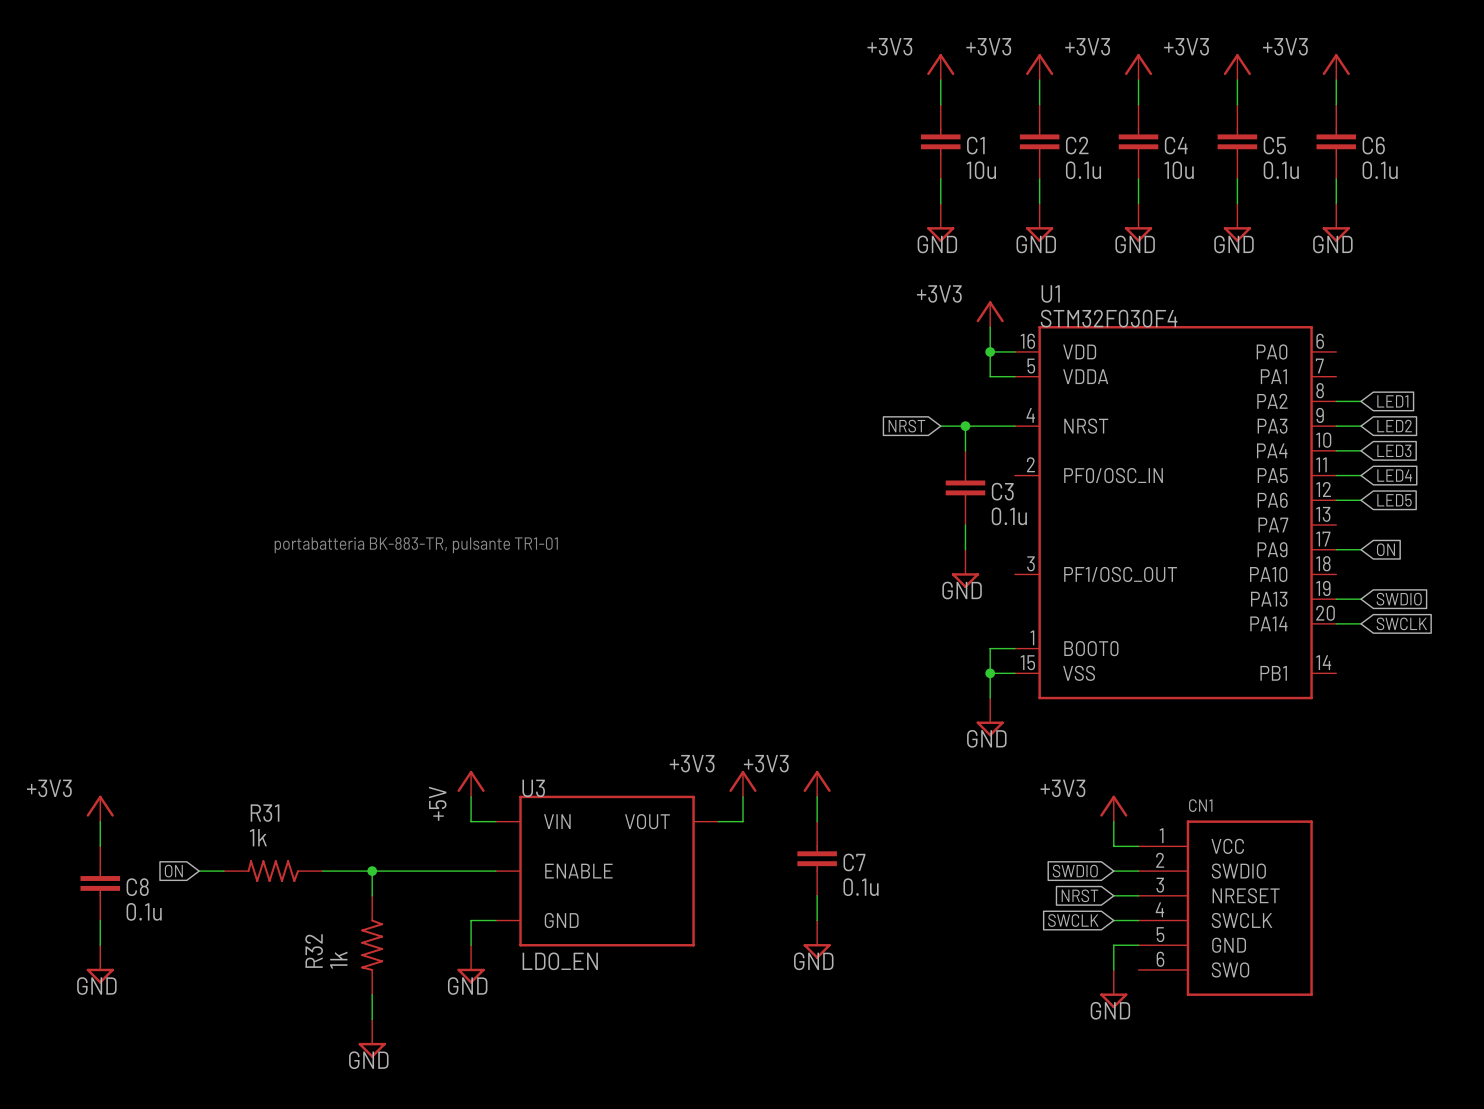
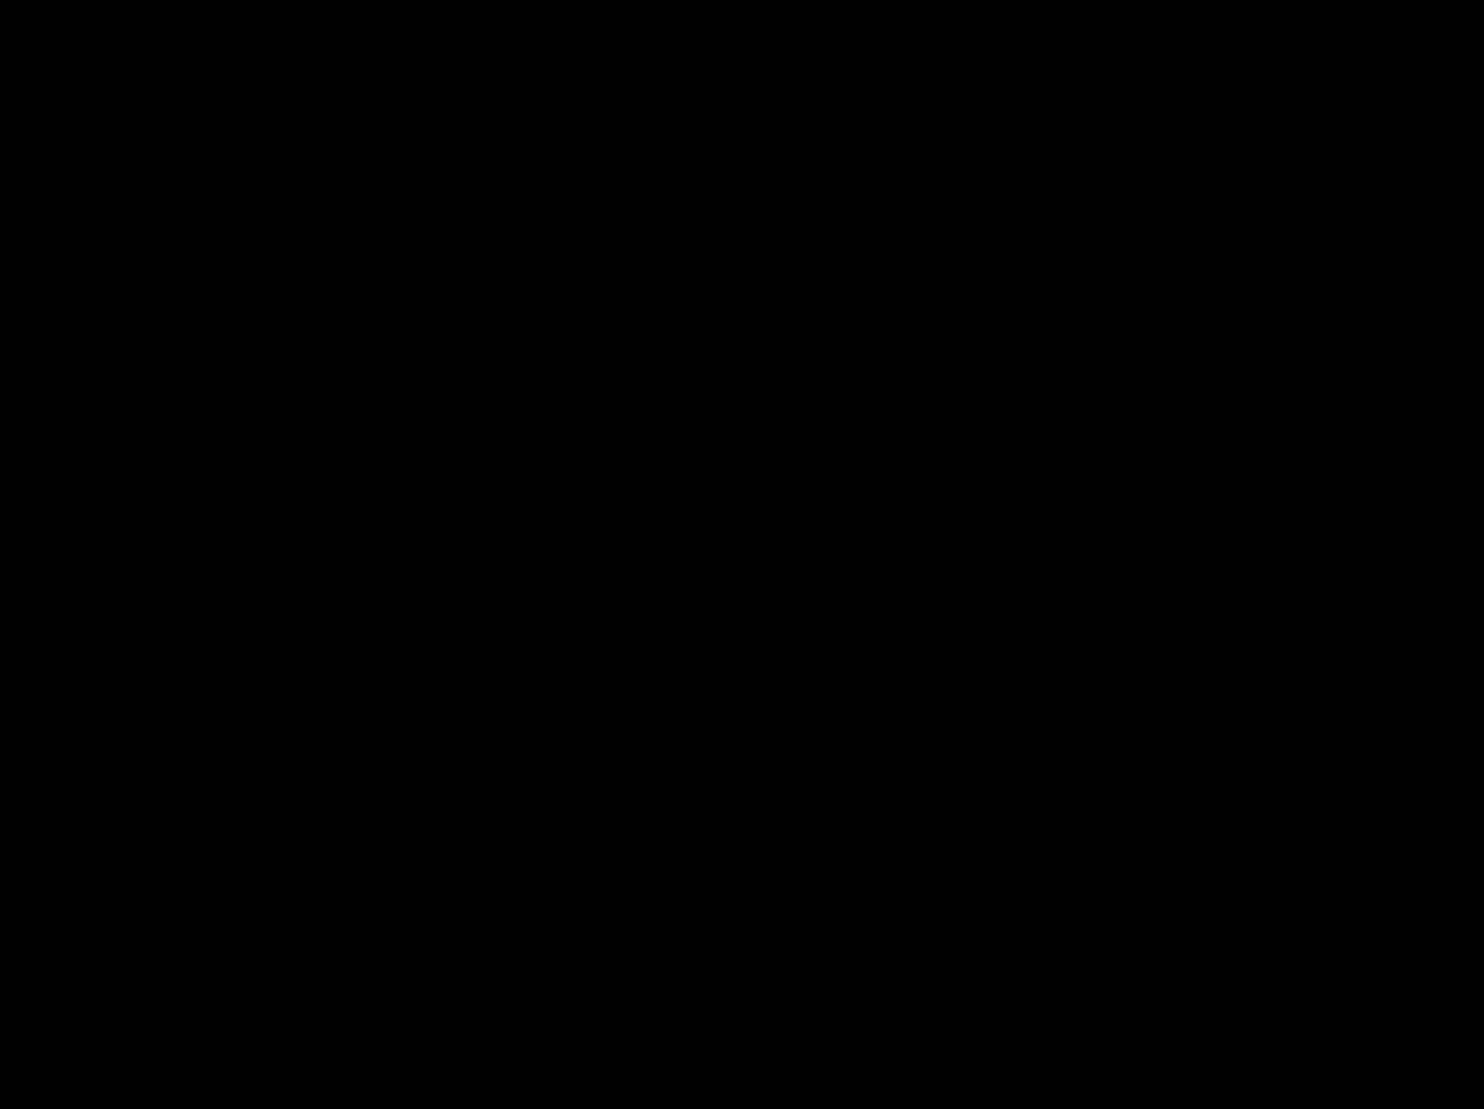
power symbol: +3V3 (940, 67) -> none
power symbol: +3V3 (1039, 67) -> none
power symbol: +3V3 (1138, 67) -> none
power symbol: +3V3 (1237, 67) -> none
power symbol: +3V3 (1336, 67) -> none
wire: (940, 80) (940, 104) -> none
wire: (1039, 80) (1039, 104) -> none
wire: (1138, 80) (1138, 104) -> none
wire: (1237, 80) (1237, 104) -> none
wire: (1336, 80) (1336, 104) -> none
C1: 10u (940, 141) -> none
C2: 0.1u (1039, 141) -> none
C4: 10u (1138, 141) -> none
C5: 0.1u (1237, 141) -> none
C6: 0.1u (1336, 141) -> none
wire: (940, 178) (940, 203) -> none
wire: (1039, 178) (1039, 203) -> none
wire: (1138, 178) (1138, 203) -> none
wire: (1237, 178) (1237, 203) -> none
wire: (1336, 178) (1336, 203) -> none
power symbol: GND (940, 222) -> none
power symbol: GND (1039, 222) -> none
power symbol: GND (1138, 222) -> none
power symbol: GND (1237, 222) -> none
power symbol: GND (1336, 222) -> none
power symbol: +3V3 (990, 314) -> none
wire: (990, 327) (990, 376) (1014, 376) -> none
wire: (990, 351) (1014, 351) -> none
junction: (990, 351) -> none
wire: (1336, 401) (1361, 401) -> none
global label: LED1 (1392, 401) -> none
global label: NRST (906, 426) -> none
wire: (940, 426) (1014, 426) -> none
wire: (965, 426) (965, 450) -> none
junction: (965, 426) -> none
wire: (1336, 426) (1361, 426) -> none
global label: LED2 (1394, 426) -> none
wire: (1336, 450) (1361, 450) -> none
global label: LED3 (1394, 450) -> none
wire: (1336, 475) (1361, 475) -> none
global label: LED4 (1394, 475) -> none
C3: 0.1u (965, 487) -> none
wire: (1336, 500) (1361, 500) -> none
global label: LED5 (1394, 500) -> none
U1: STM32F030F4 (1175, 512) -> none
wire: (965, 525) (965, 549) -> none
text: portabatteria BK-883-TR, pulsante TR1-01 (416, 545) -> none
wire: (1336, 549) (1361, 549) -> none
global label: ON (1385, 549) -> none
power symbol: GND (965, 568) -> none
wire: (1336, 599) (1361, 599) -> none
global label: SWDIO (1399, 599) -> none
wire: (1336, 623) (1361, 623) -> none
global label: SWCLK (1401, 623) -> none
wire: (1014, 648) (990, 648) (990, 698) -> none
wire: (990, 673) (1014, 673) -> none
junction: (990, 673) -> none
power symbol: GND (990, 717) -> none
power symbol: +5V (471, 783) -> none
power symbol: +3V3 (742, 783) -> none
power symbol: +3V3 (817, 783) -> none
wire: (471, 796) (471, 821) (495, 821) -> none
wire: (742, 796) (742, 821) (718, 821) -> none
wire: (817, 796) (817, 821) -> none
power symbol: +3V3 (100, 808) -> none
power symbol: +3V3 (1113, 808) -> none
wire: (100, 821) (100, 846) -> none
wire: (1113, 821) (1113, 846) (1138, 846) -> none
C7: 0.1u (817, 858) -> none
global label: ON (173, 871) -> none
wire: (199, 871) (223, 871) -> none
R31: 1k (273, 871) -> none
wire: (322, 871) (495, 871) -> none
wire: (372, 871) (372, 895) -> none
junction: (372, 871) -> none
U3: LDO_EN (607, 871) -> none
global label: SWDIO (1075, 871) -> none
wire: (1113, 871) (1138, 871) -> none
C8: 0.1u (100, 883) -> none
wire: (817, 895) (817, 920) -> none
global label: NRST (1079, 895) -> none
wire: (1113, 895) (1138, 895) -> none
CN1: (1225, 908) -> none
wire: (100, 920) (100, 945) -> none
wire: (495, 920) (471, 920) (471, 945) -> none
global label: SWCLK (1073, 920) -> none
wire: (1113, 920) (1138, 920) -> none
power symbol: GND (817, 939) -> none
R32: 1k (372, 945) -> none
wire: (1138, 945) (1113, 945) (1113, 969) -> none
power symbol: GND (100, 964) -> none
power symbol: GND (471, 964) -> none
power symbol: GND (1113, 989) -> none
wire: (372, 994) (372, 1019) -> none
power symbol: GND (372, 1038) -> none

